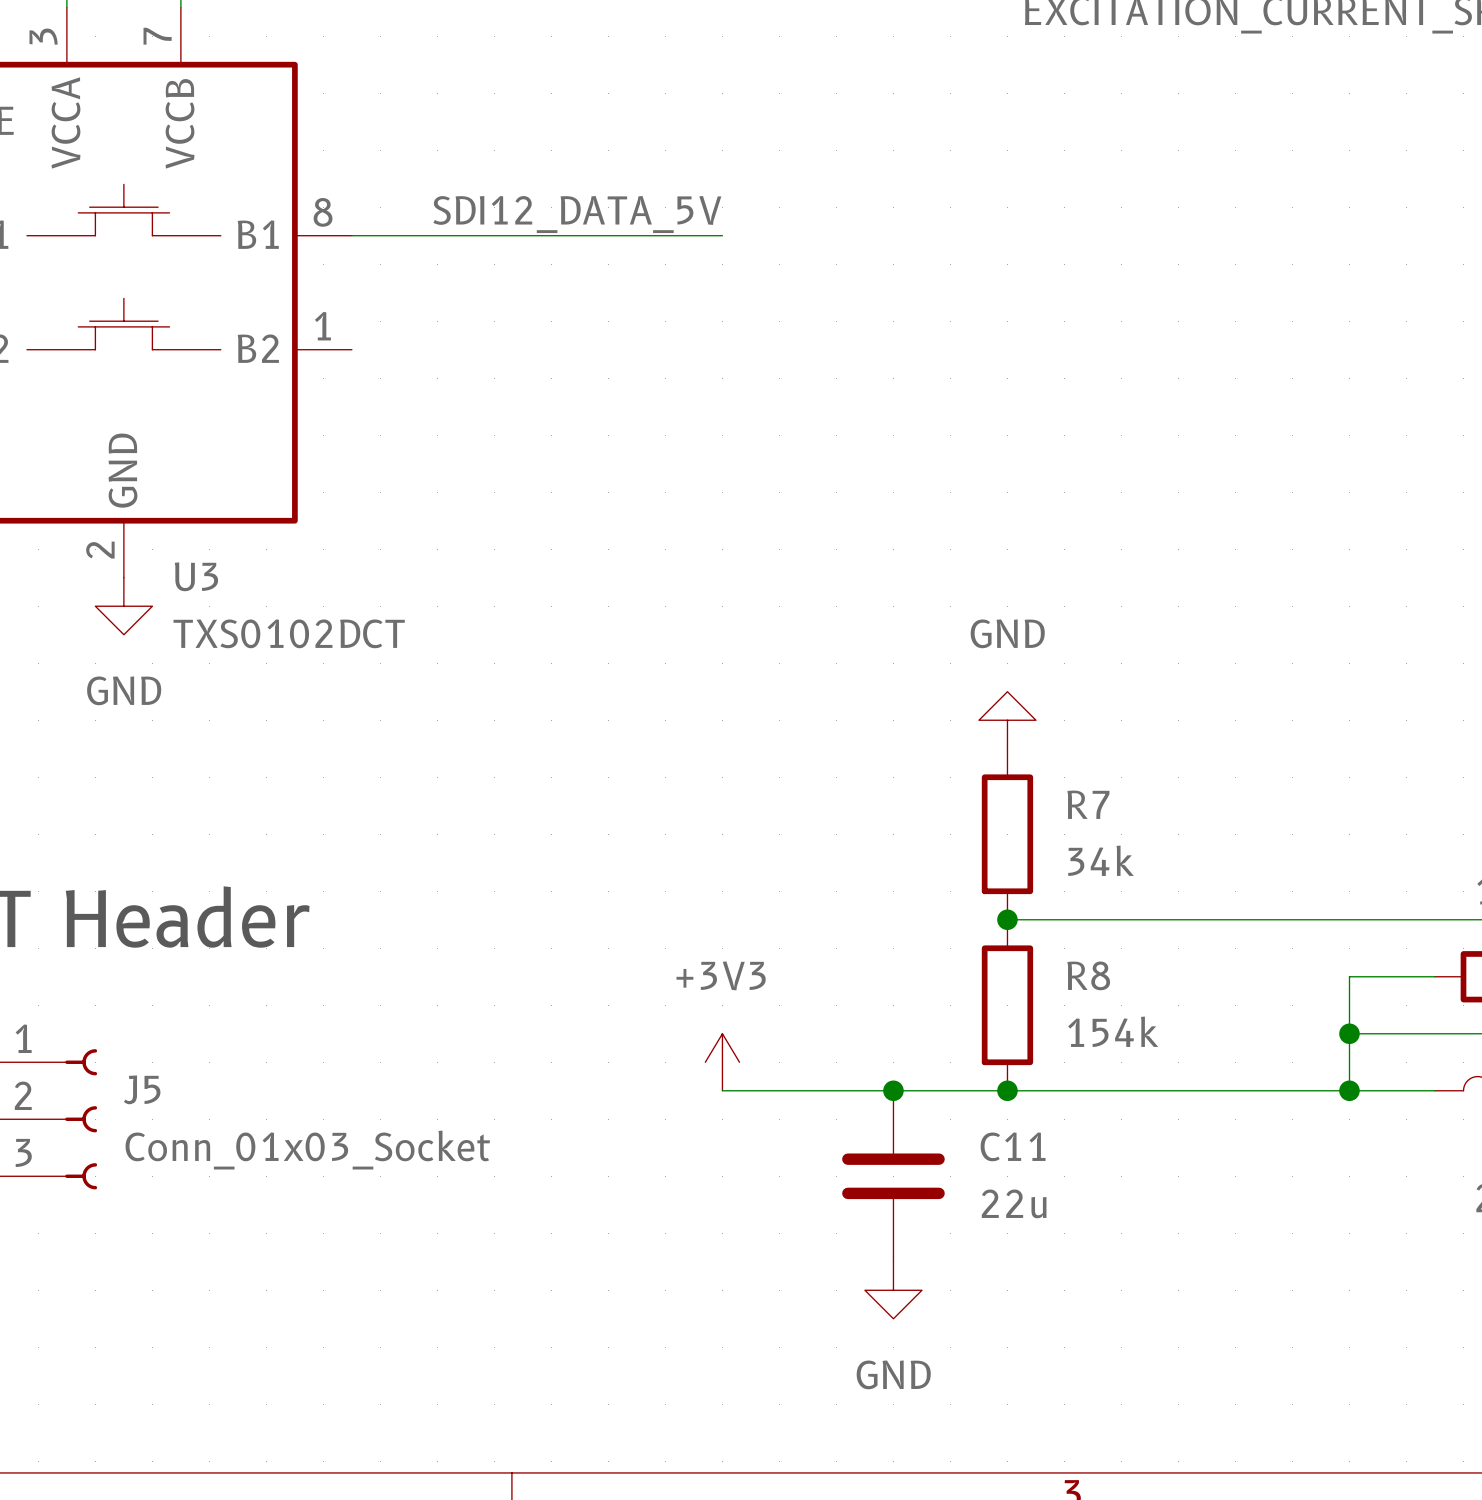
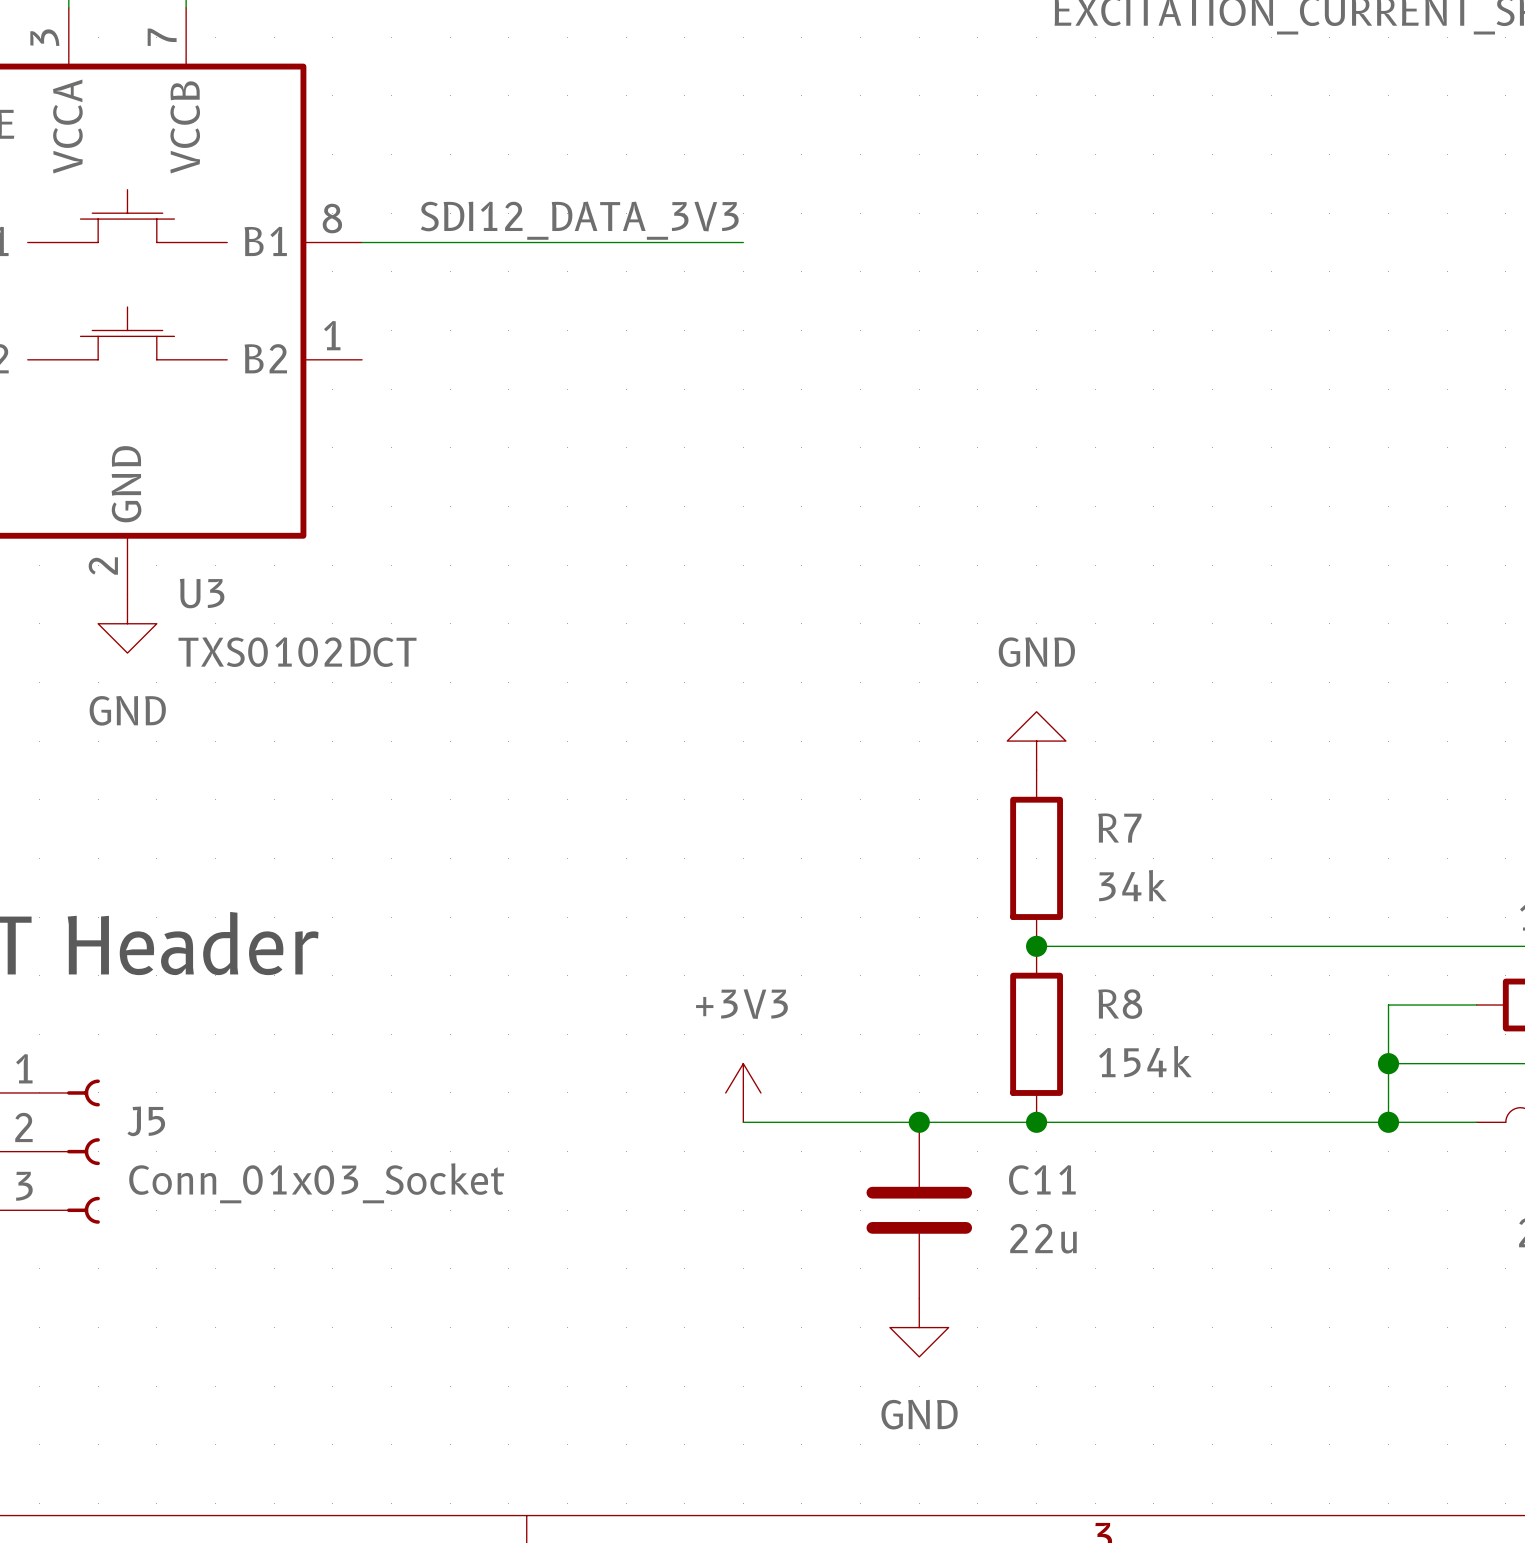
label: SDI12_DATA_5V (577, 214) -> SDI12_DATA_3V3 (579, 220)

